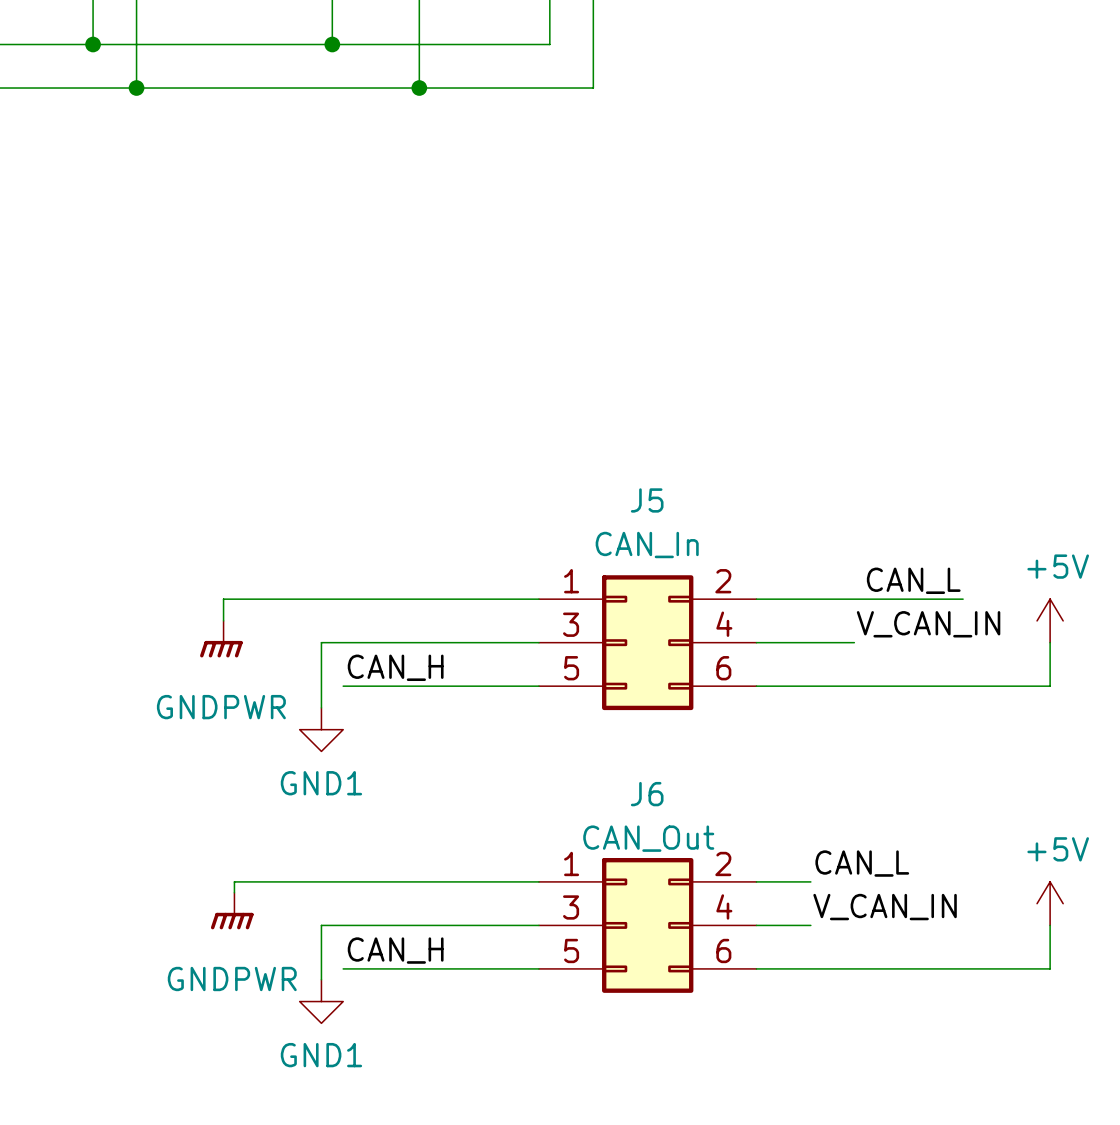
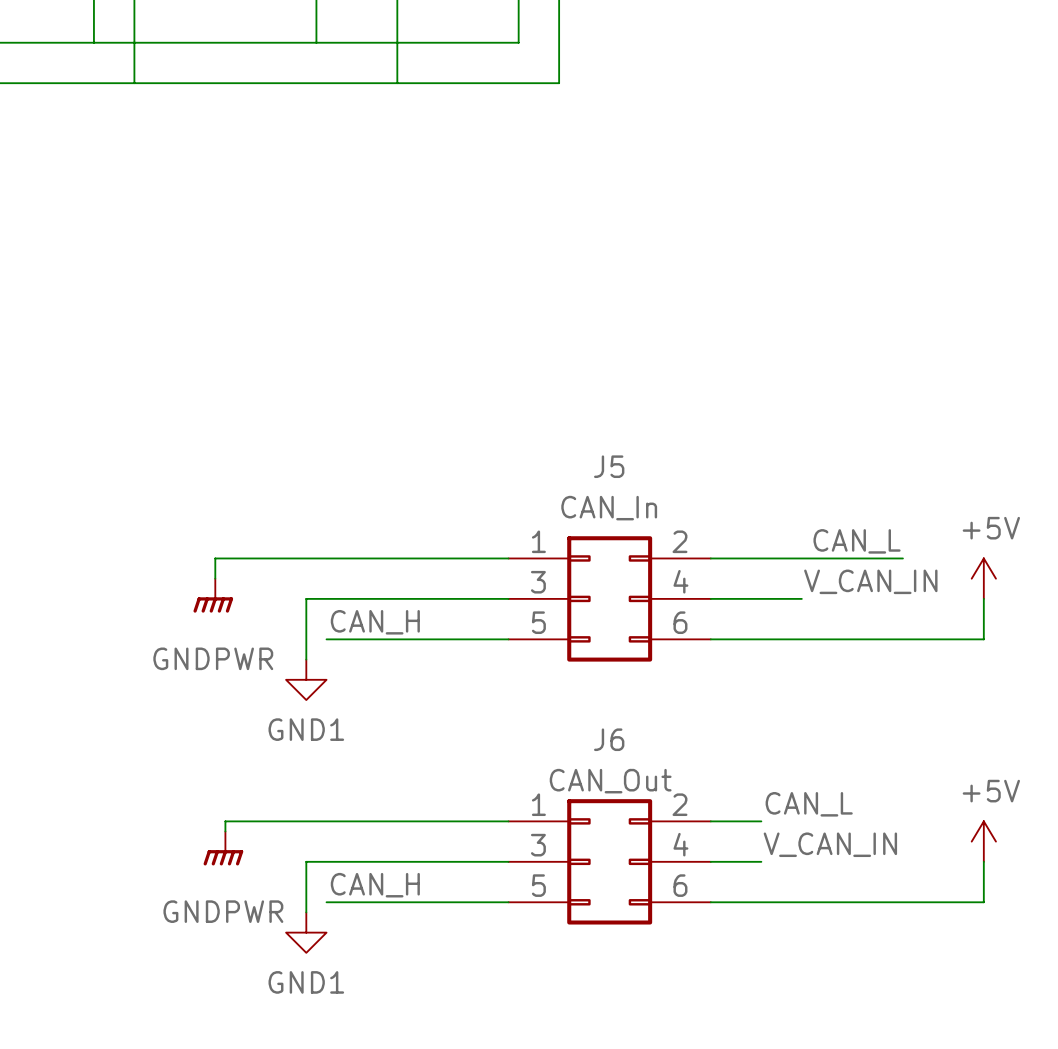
junction: (93, 44) -> none
junction: (332, 44) -> none
junction: (136, 88) -> none
junction: (419, 88) -> none

